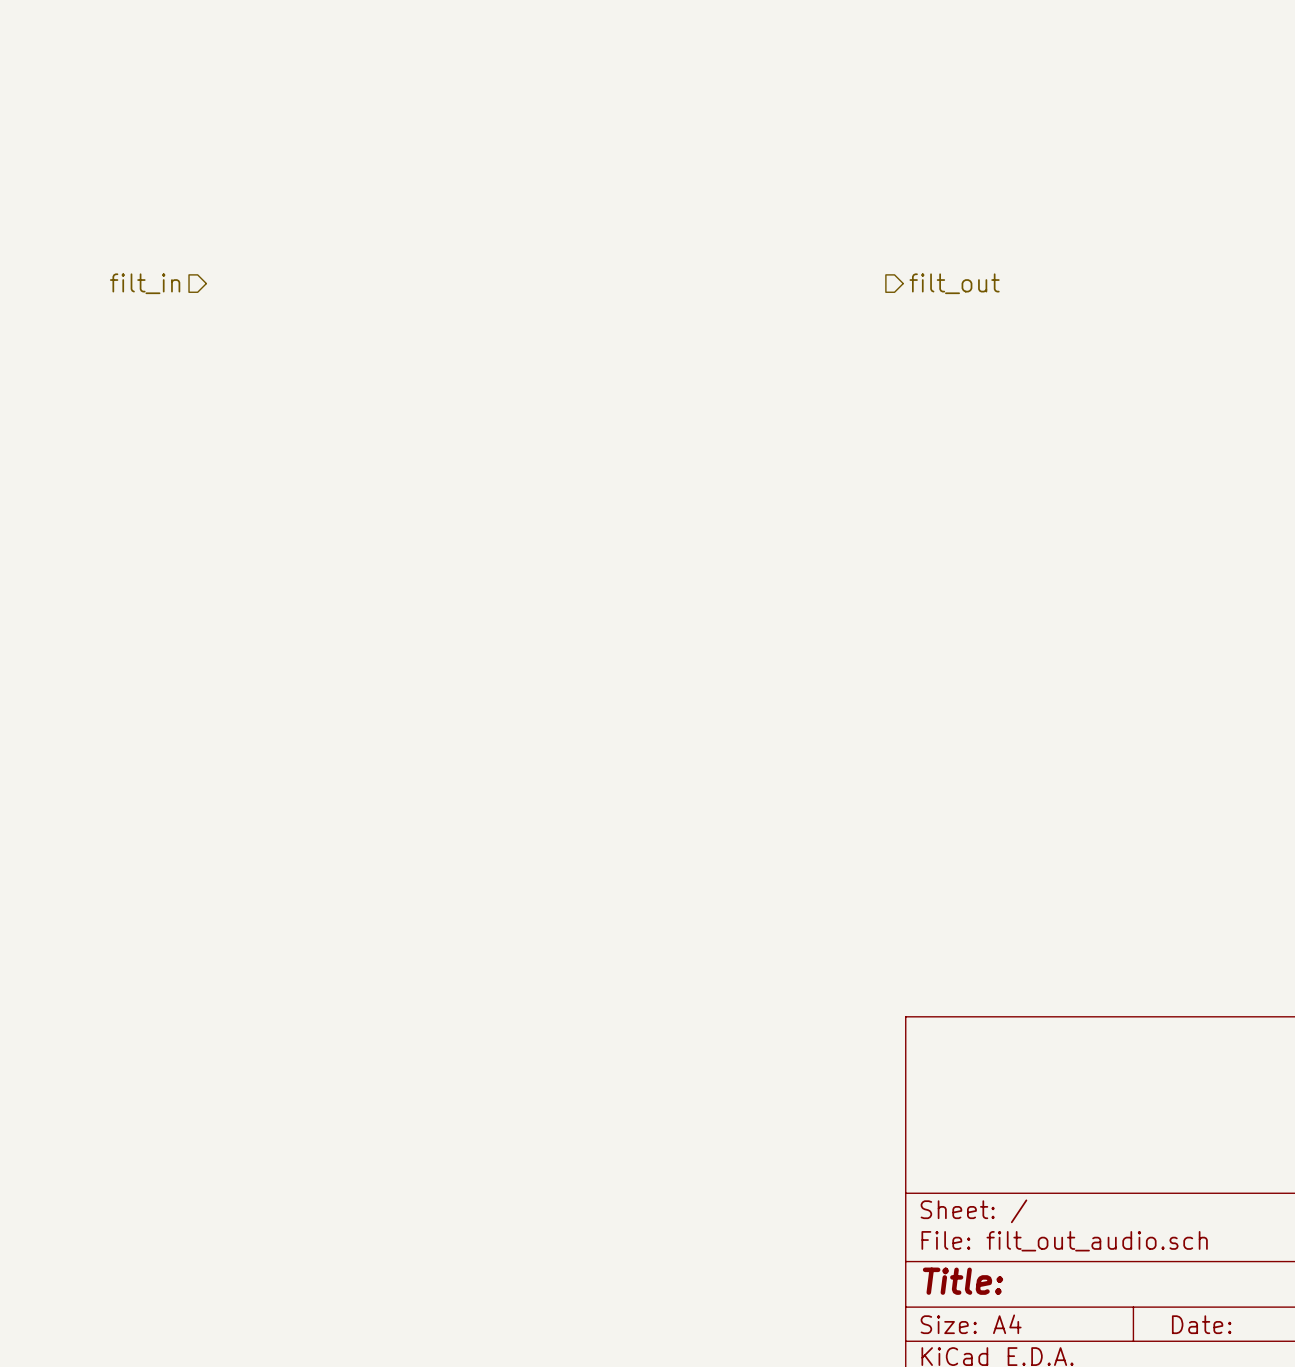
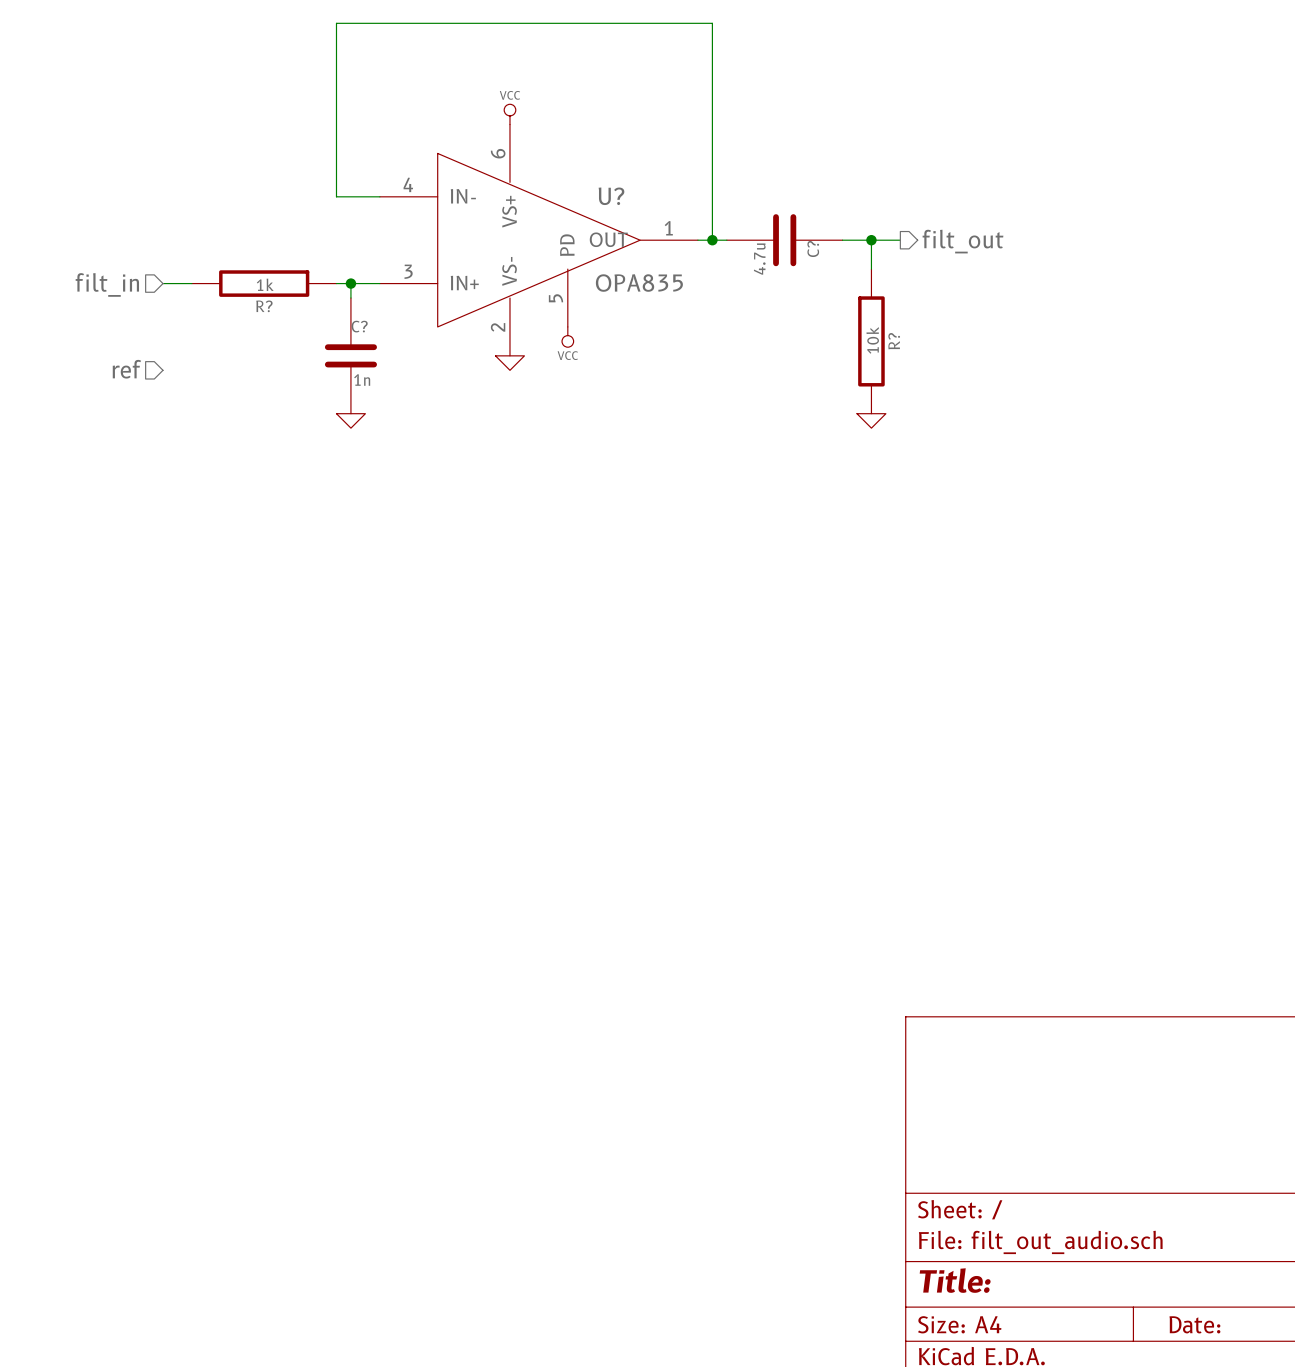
power symbol: none -> VCC (509, 114)
wire: none -> (379, 196) (336, 196) (336, 23) (712, 23) (712, 240)
U?: none -> OPA835 (538, 240)
wire: none -> (697, 240) (726, 240)
junction: none -> (712, 240)
C?: none -> 4.7u (784, 240)
wire: none -> (842, 240) (900, 240)
wire: none -> (871, 240) (871, 269)
junction: none -> (871, 240)
hierarchical label position: filt_in (145, 283) -> filt_in (107, 284)
wire: none -> (162, 283) (191, 283)
R?: none -> 1k (264, 283)
wire: none -> (336, 283) (379, 283)
wire: none -> (350, 283) (350, 298)
junction: none -> (350, 283)
hierarchical label position: filt_out (954, 283) -> filt_out (962, 241)
power symbol: none -> VCC (567, 337)
R?: none -> 10k (871, 341)
C?: none -> 1n (350, 355)
power symbol: none -> (509, 363)
hierarchical label: none -> ref (126, 369)
power symbol: none -> (350, 420)
power symbol: none -> (871, 420)

